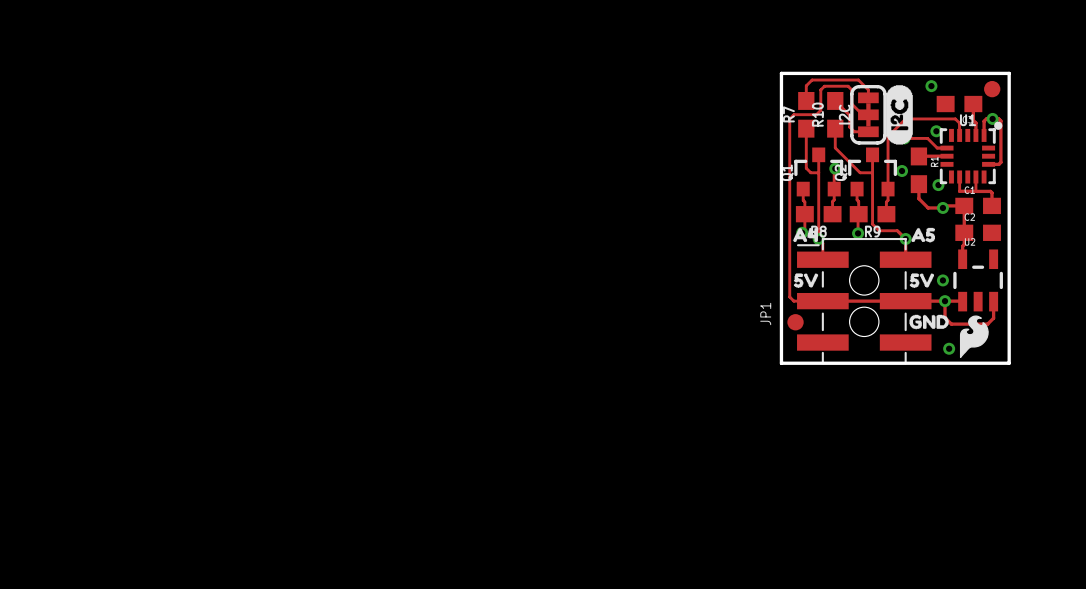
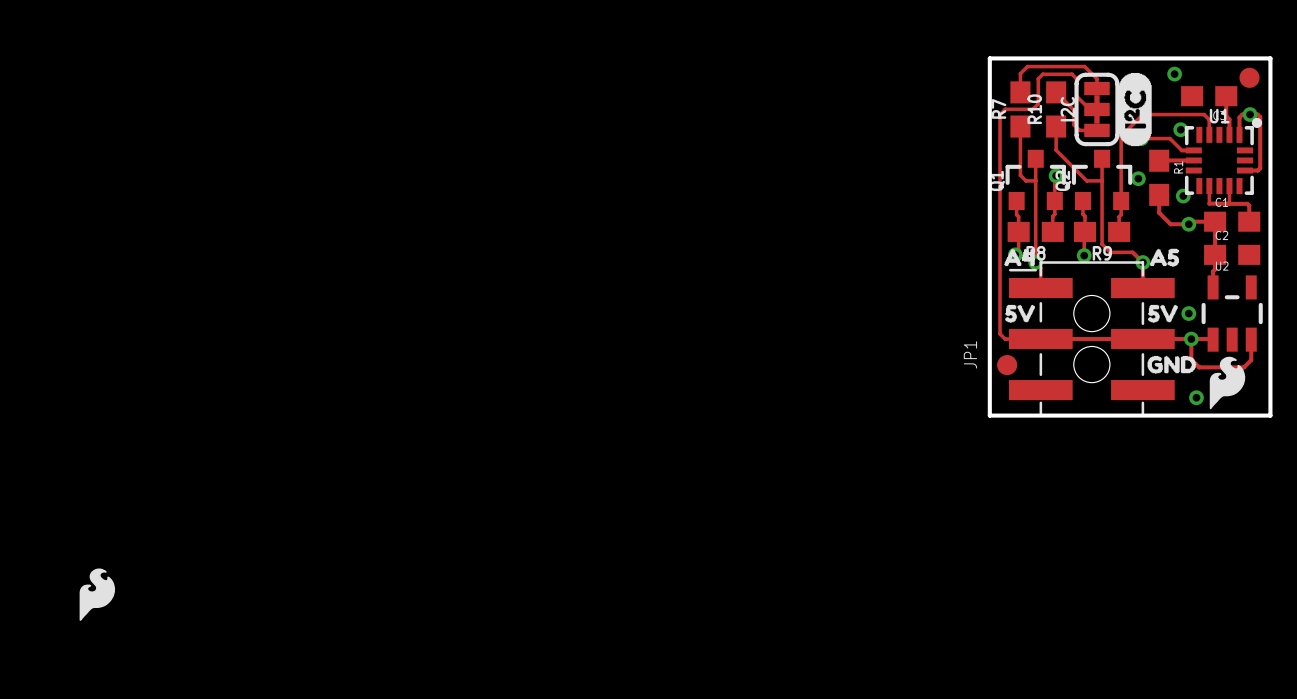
drawing: none -> [79, 568, 116, 621]

